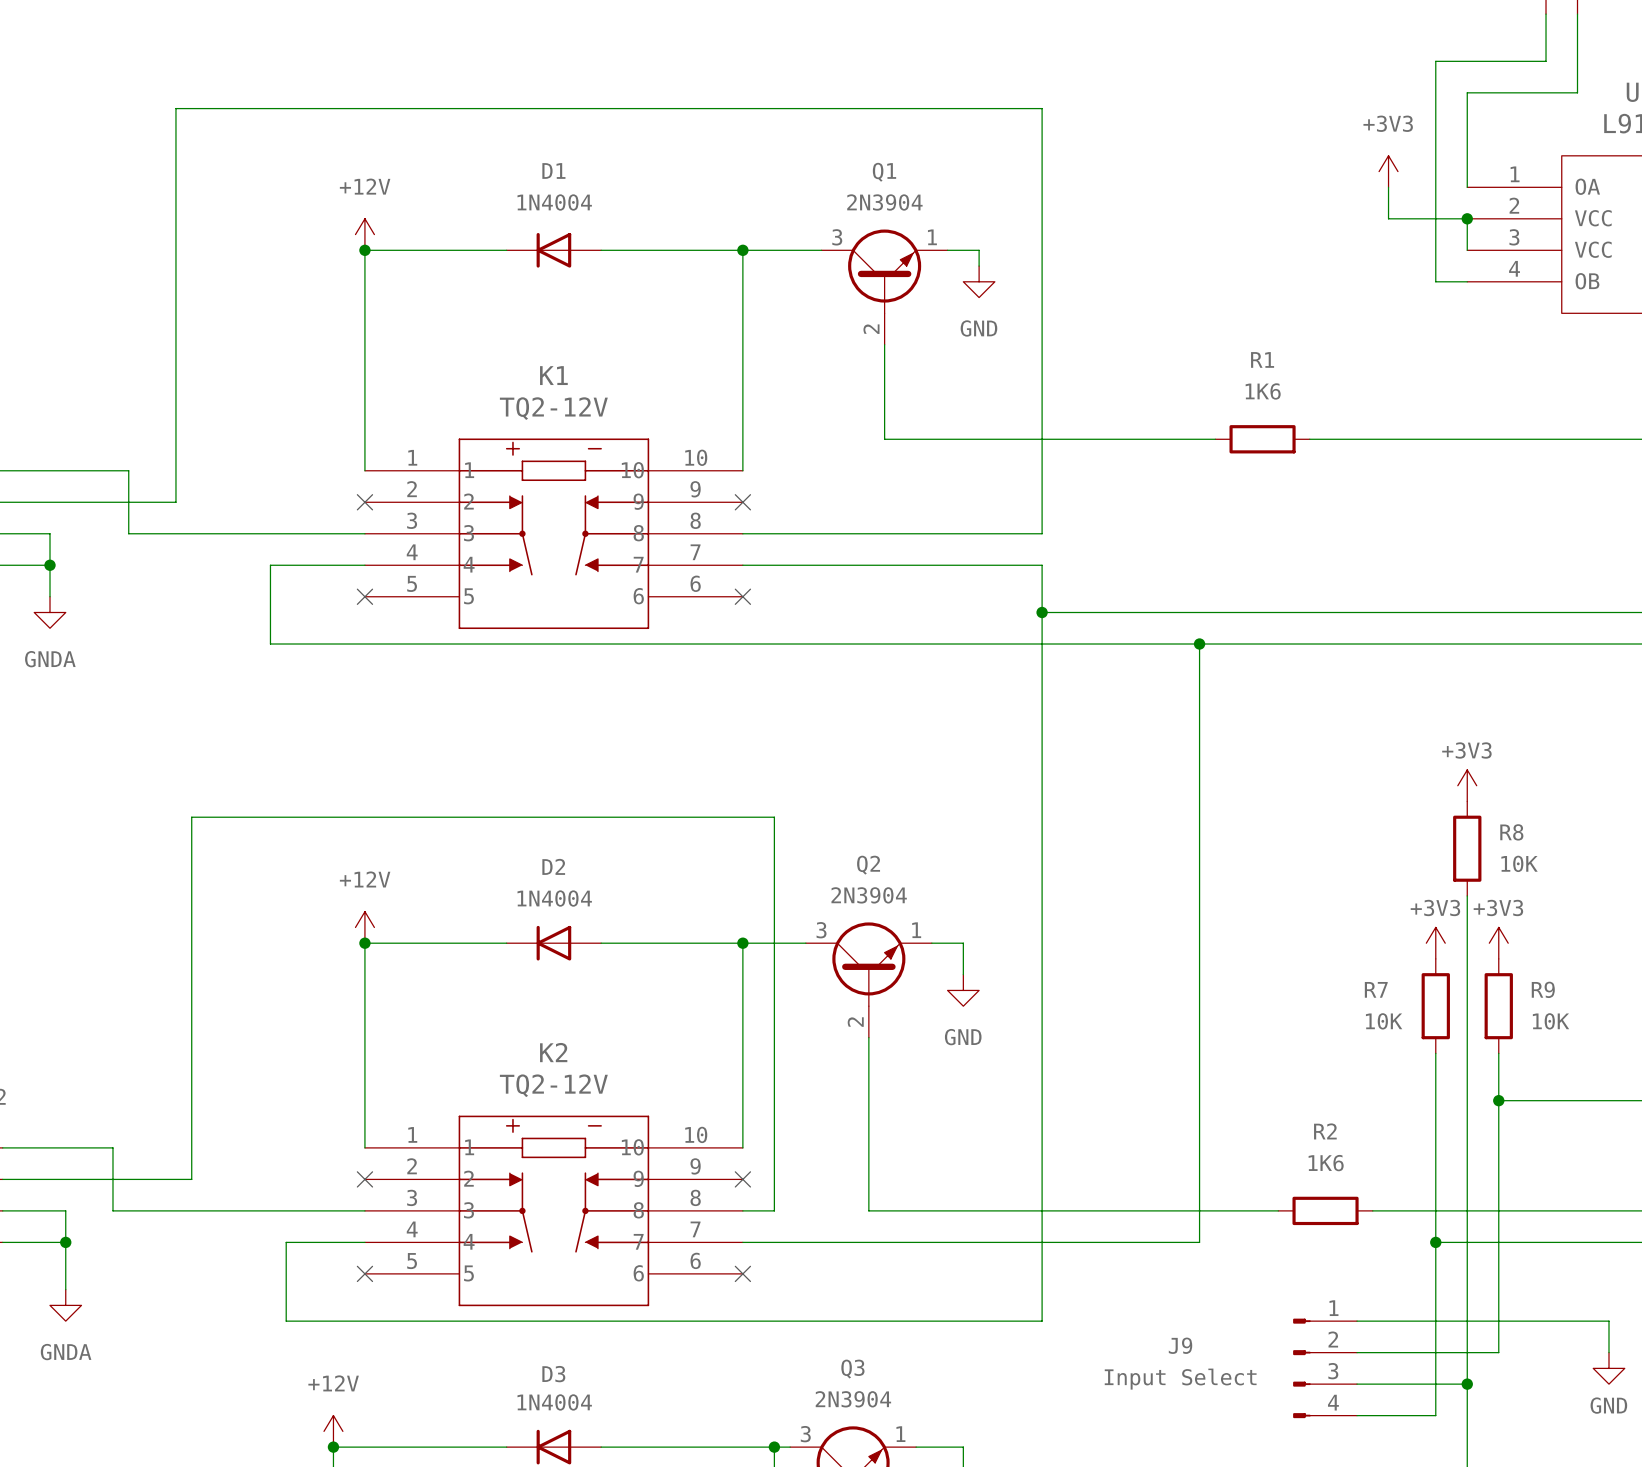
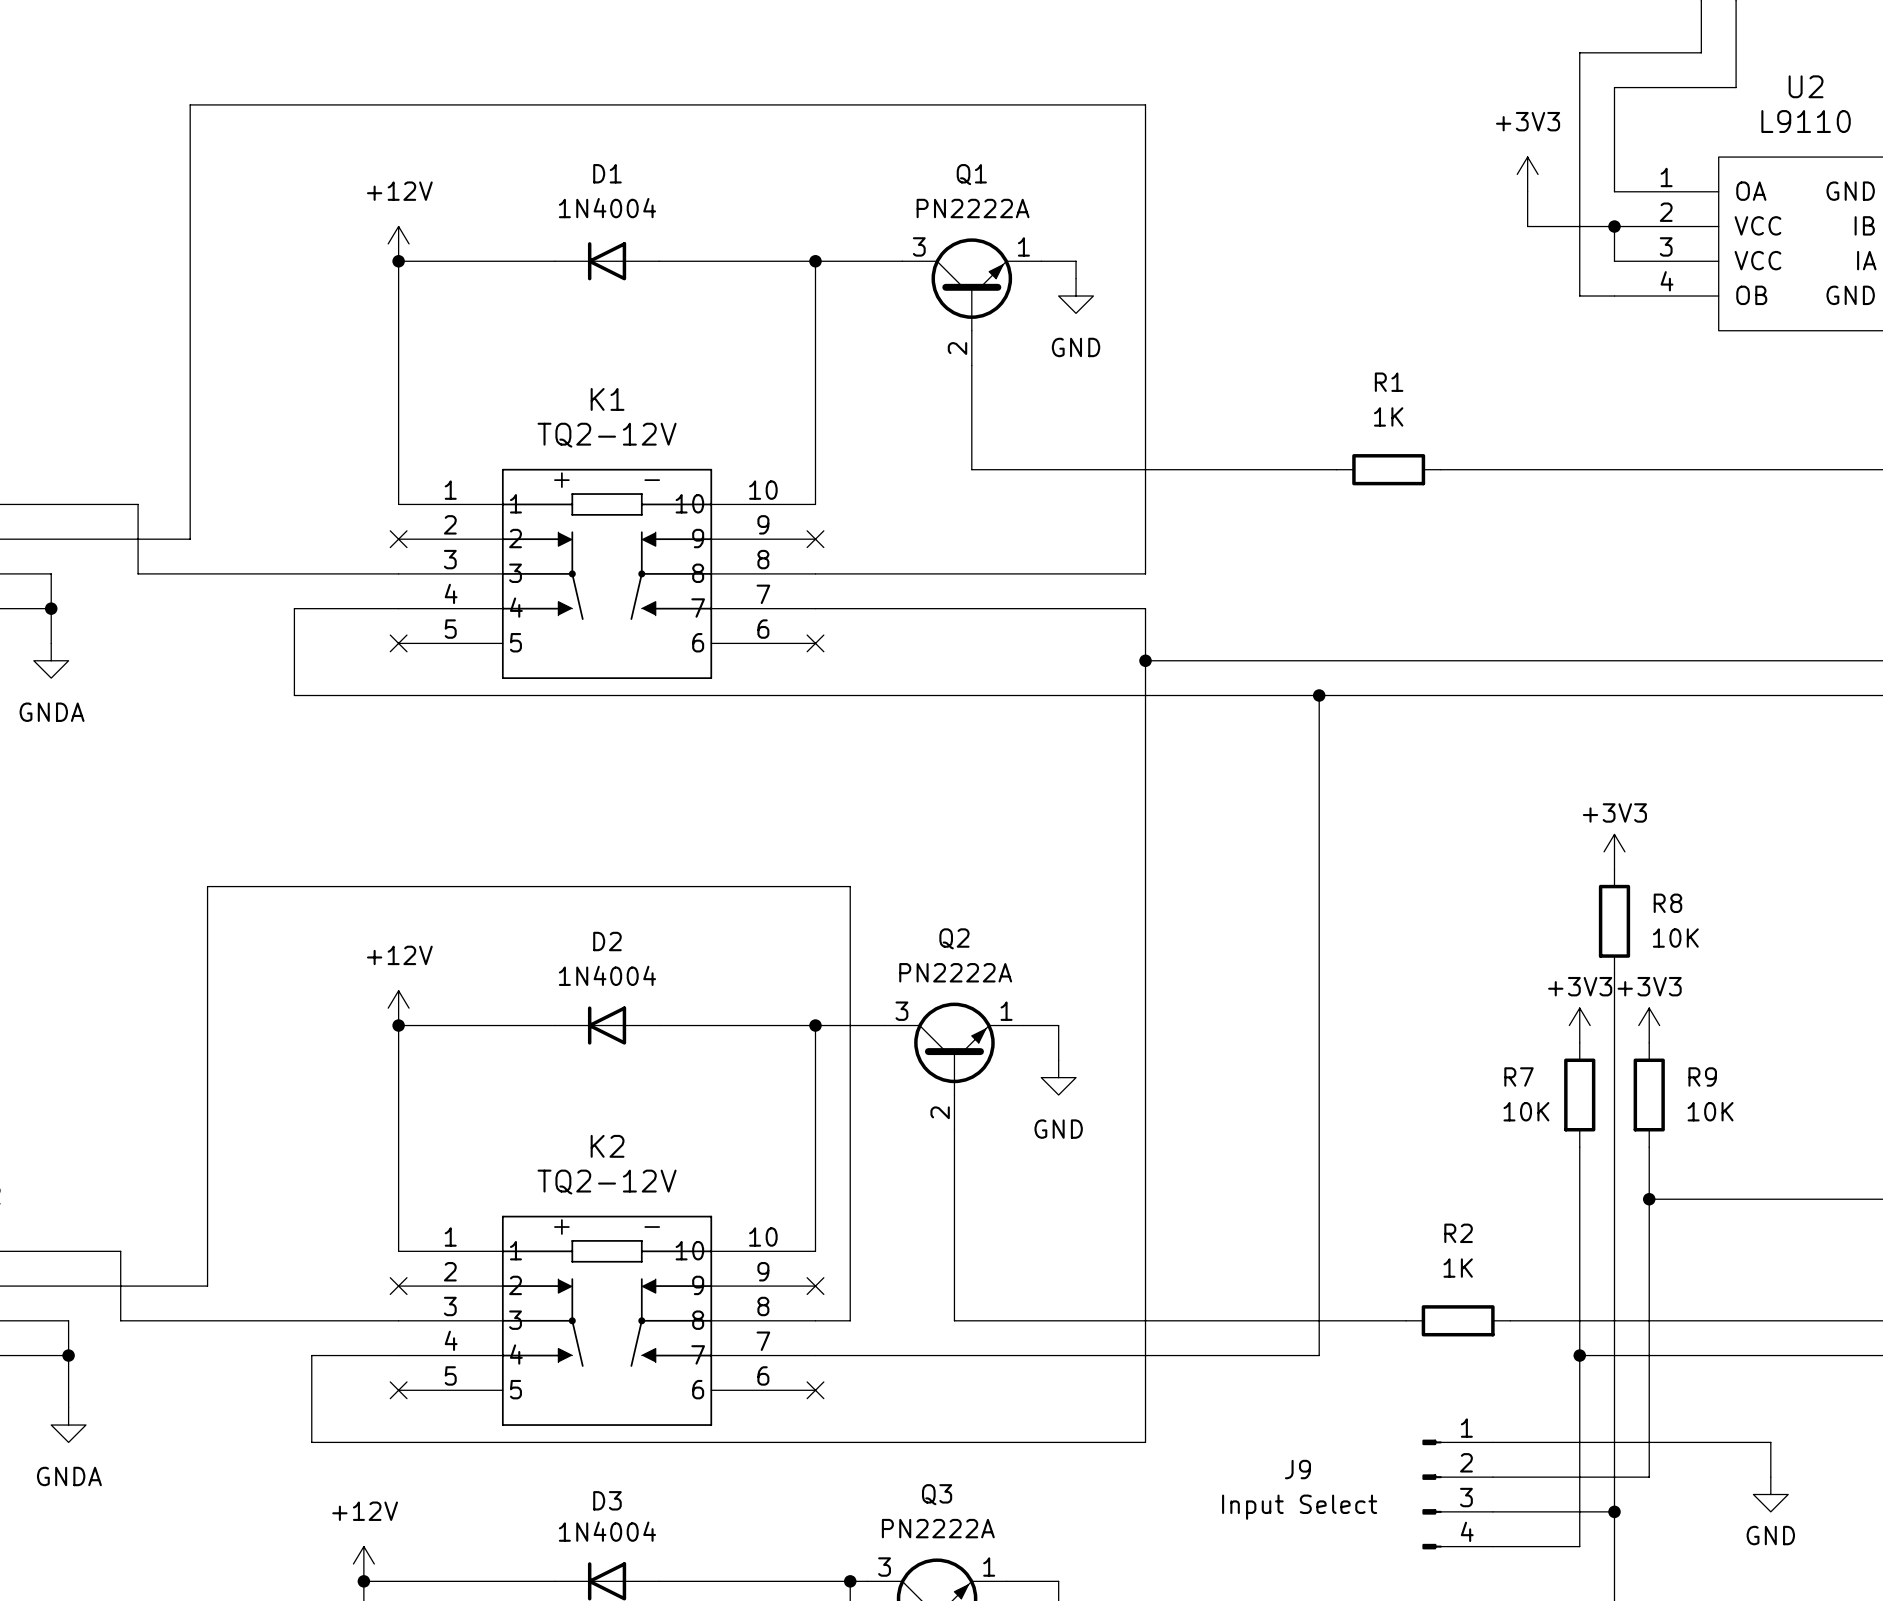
Q1 value: 2N3904 (884, 202) -> PN2222A (973, 208)
R1 value: 1K6 (1263, 391) -> 1K (1388, 416)
Q2 value: 2N3904 (869, 895) -> PN2222A (955, 972)
R2 value: 1K6 (1326, 1163) -> 1K (1458, 1268)
Q3 value: 2N3904 (853, 1399) -> PN2222A (938, 1528)

